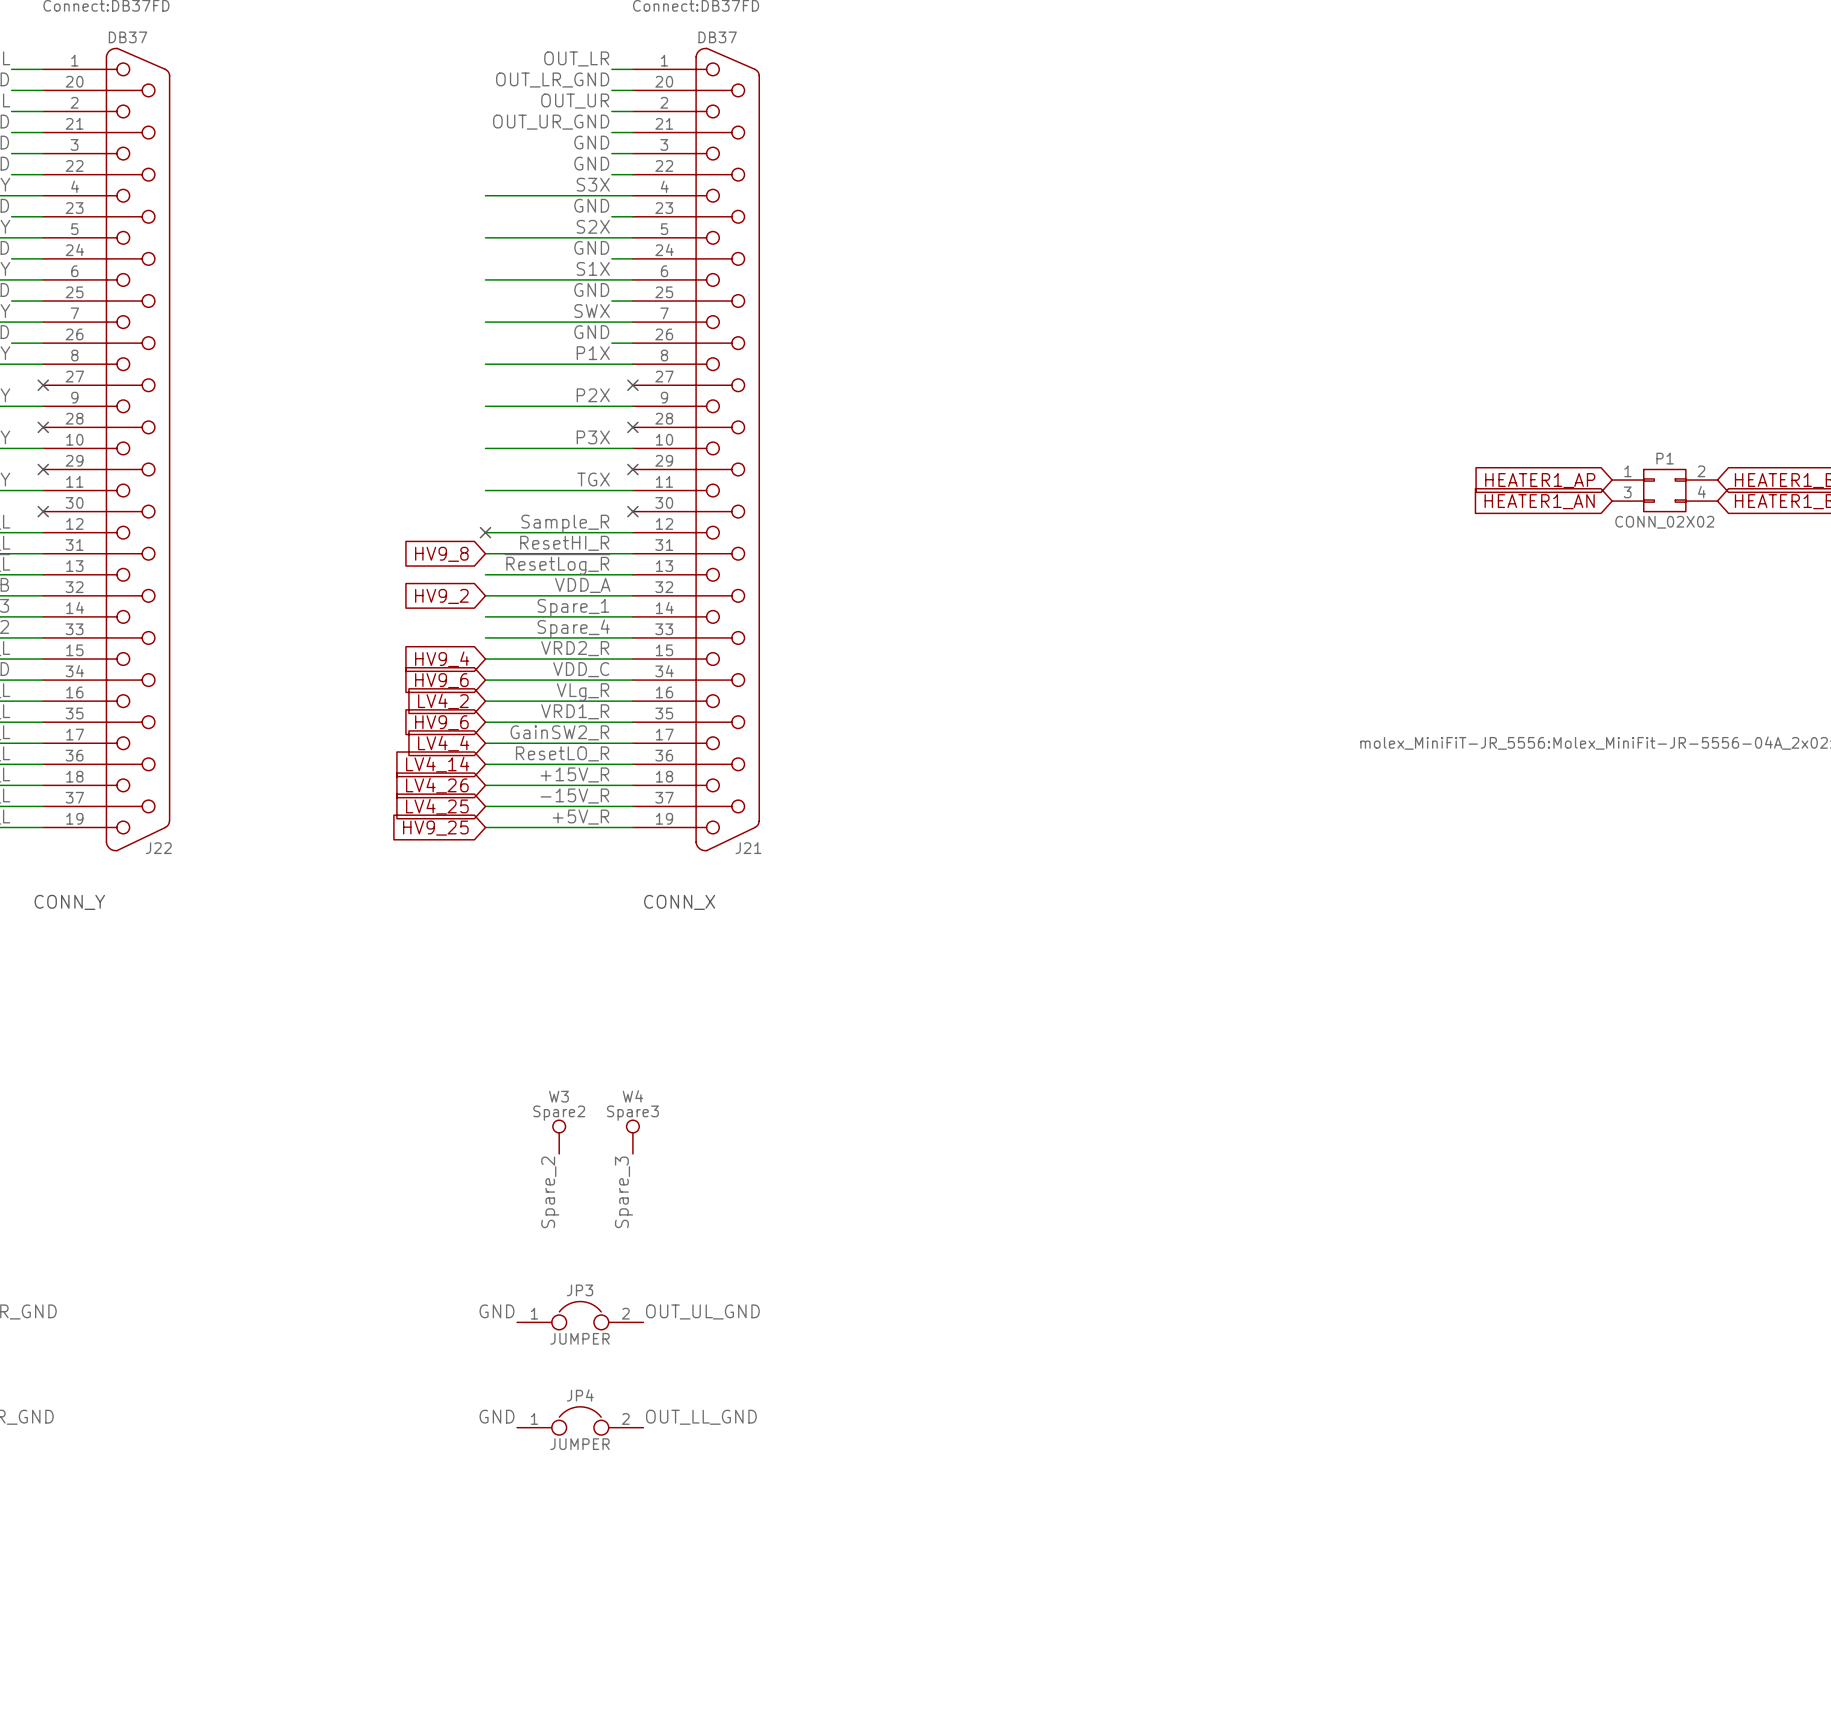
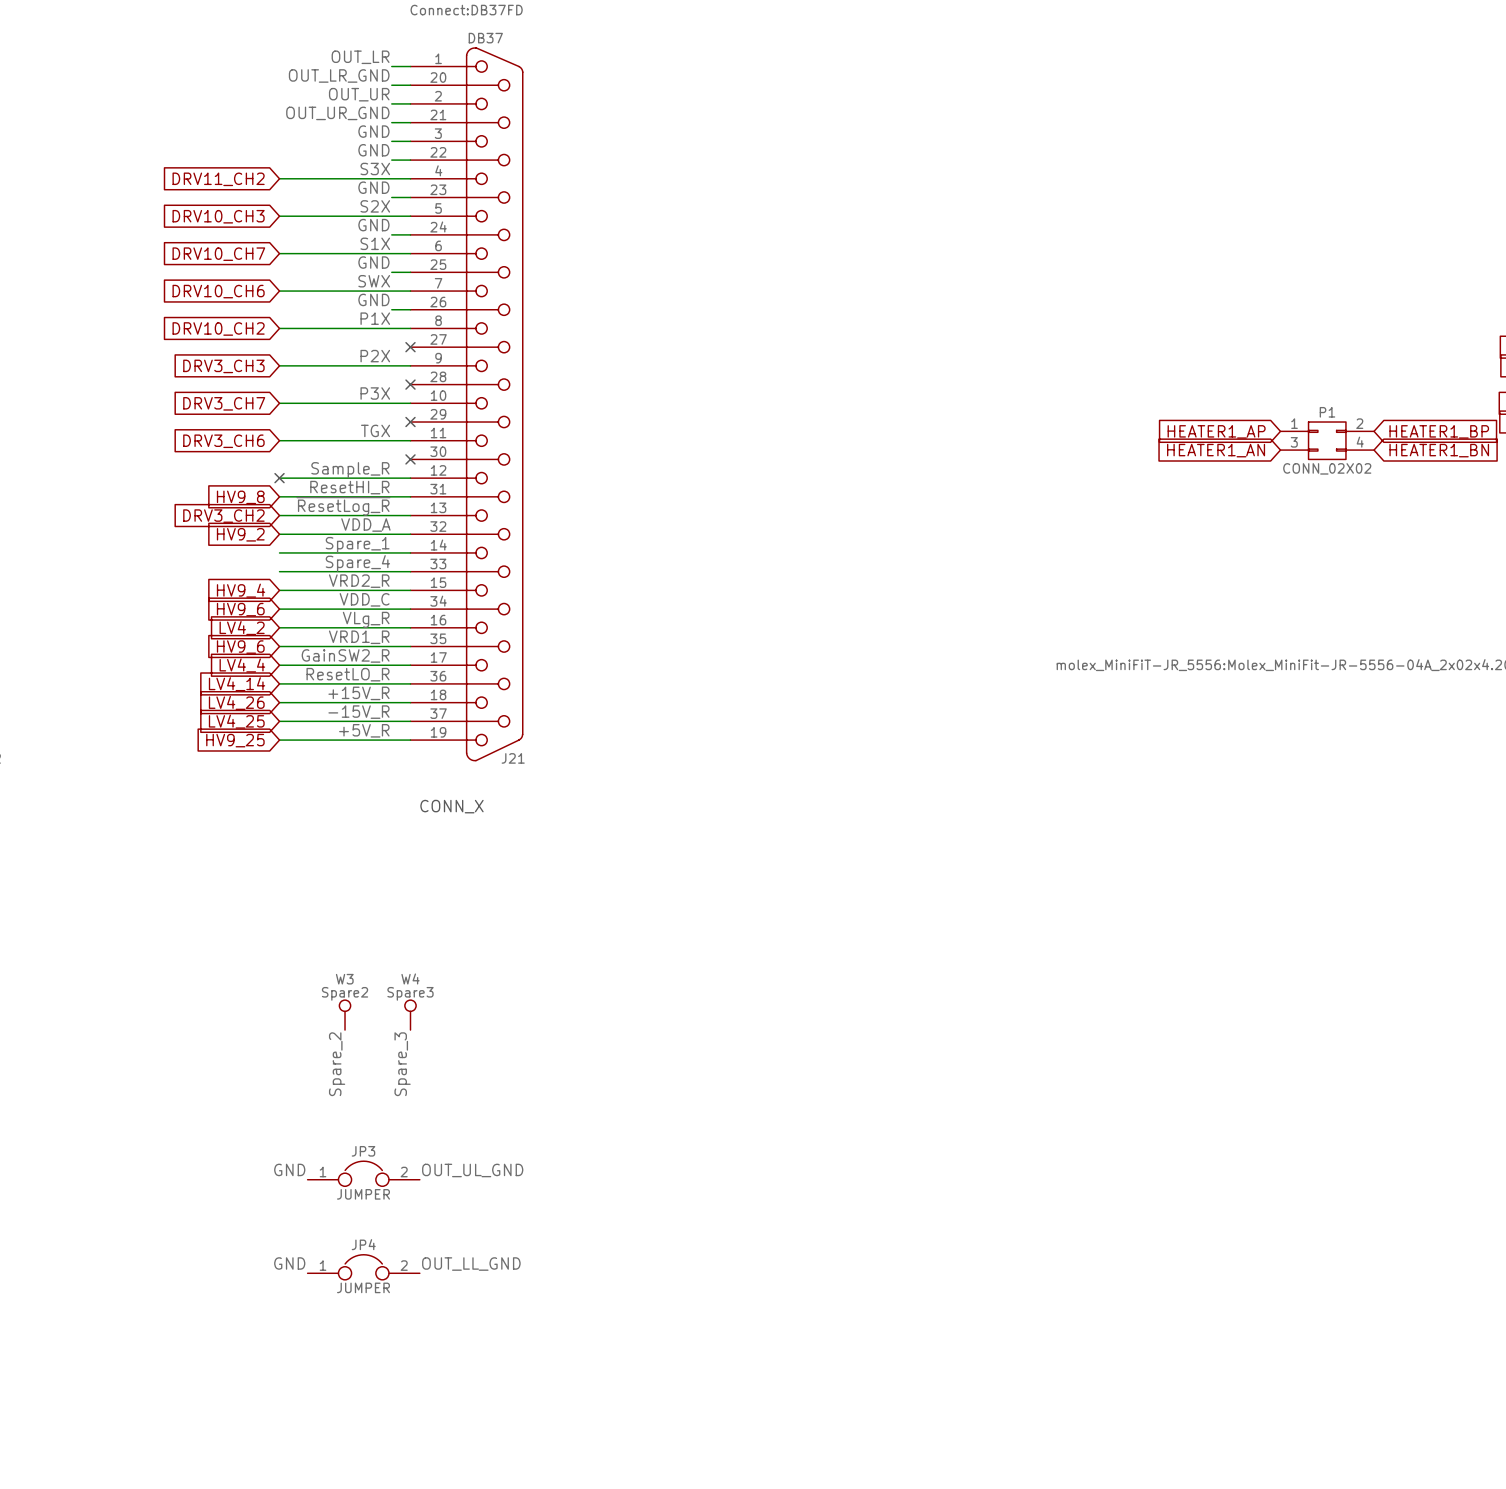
global label: none -> DRV11_CH2 (218, 179)
global label: none -> DRV10_CH3 (218, 216)
global label: none -> DRV10_CH7 (218, 254)
global label: none -> DRV10_CH6 (218, 291)
global label: none -> DRV10_CH2 (218, 328)
global label: none -> DRV3_CH3 (223, 366)
global label: none -> DRV3_CH7 (224, 403)
global label: none -> DRV3_CH6 (223, 441)
global label: none -> DRV3_CH2 (223, 516)

